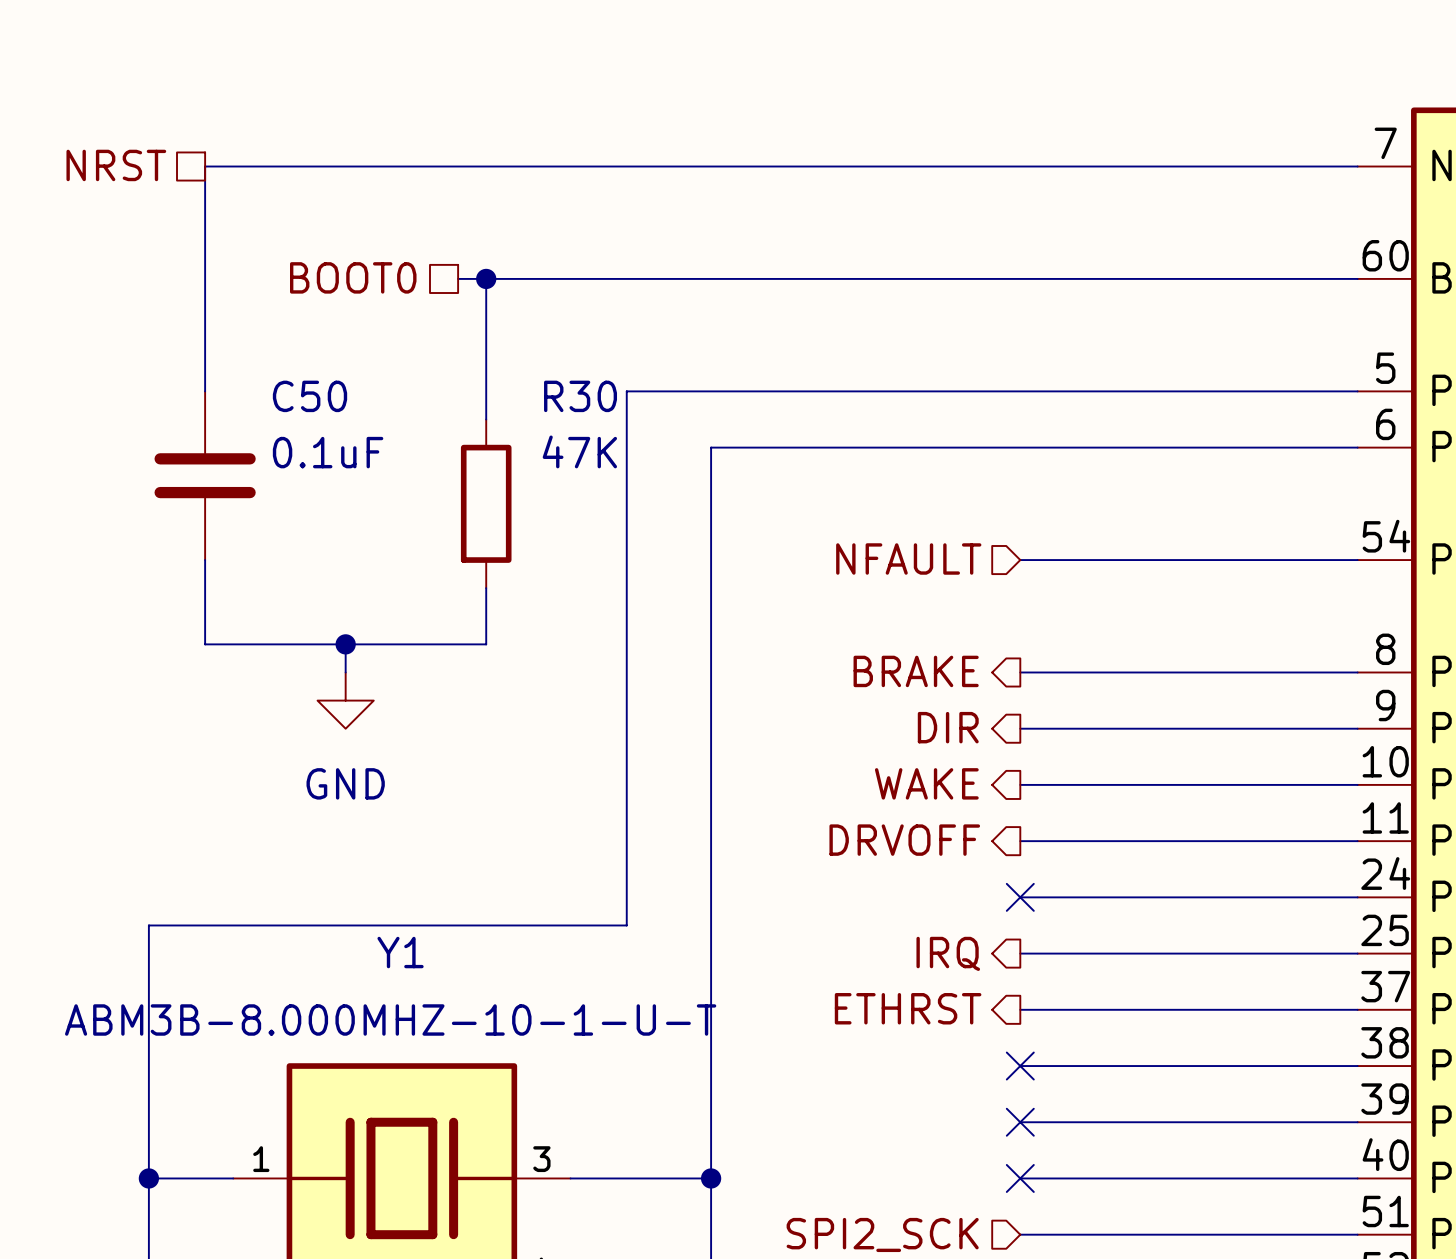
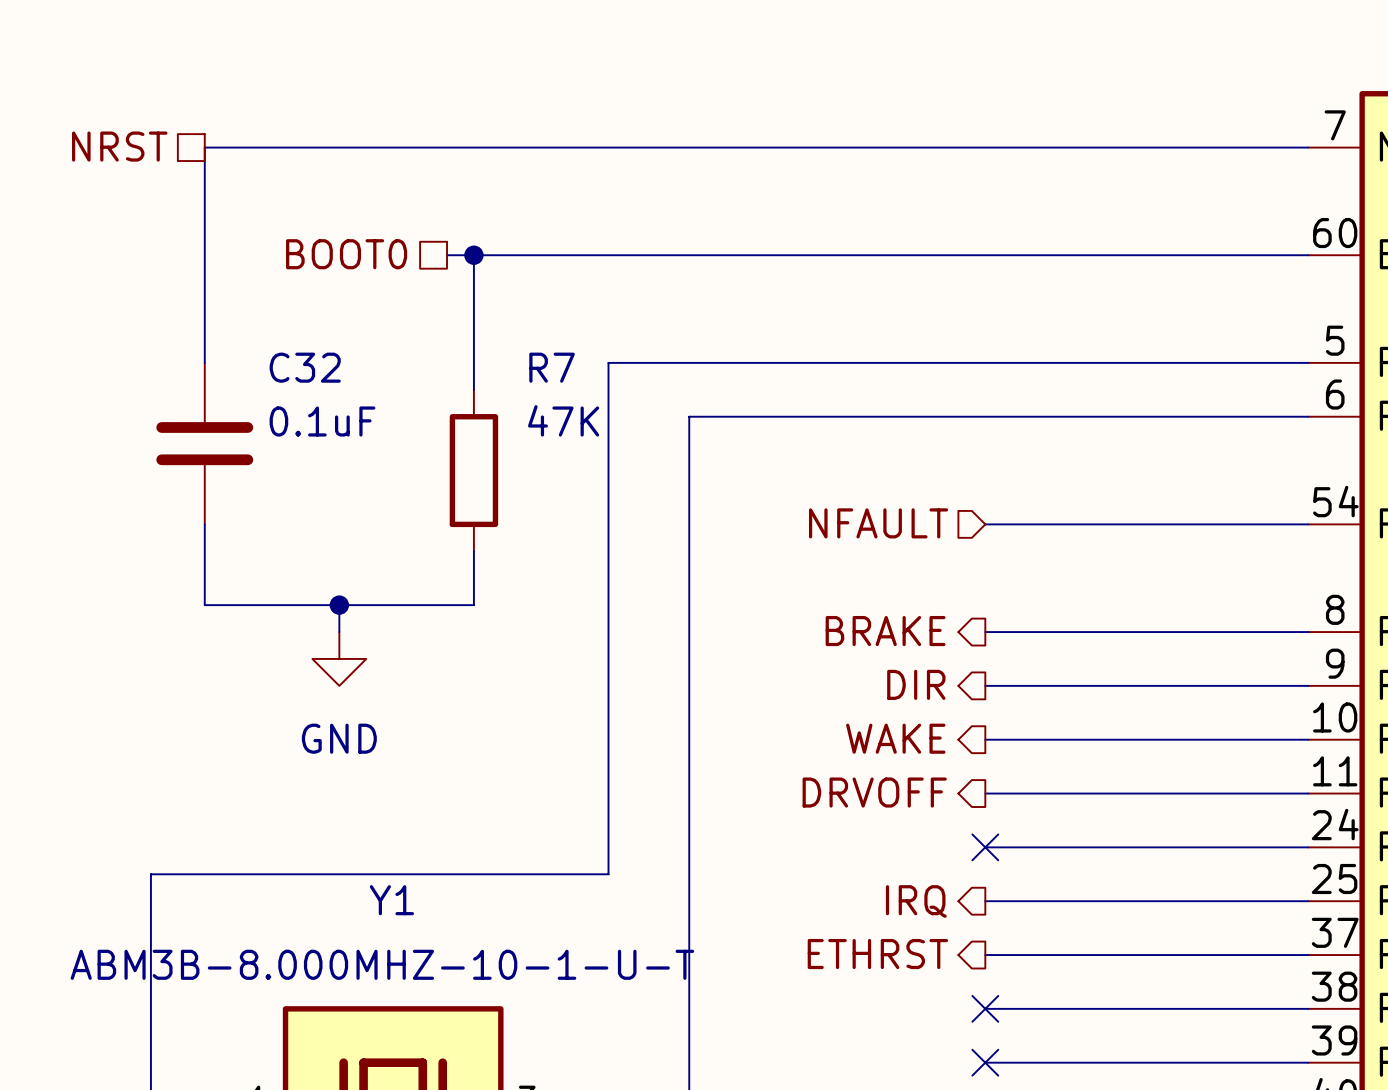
C50 name: C50 (310, 396) -> C32 (305, 367)
R30 name: R30 (580, 396) -> R7 (552, 367)

